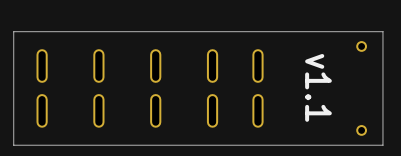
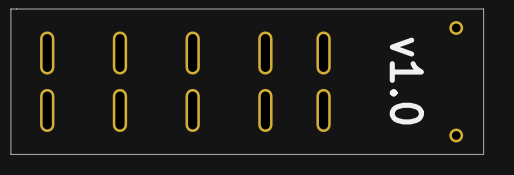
text: v1.1 (318, 87) -> v1.0 (406, 81)

